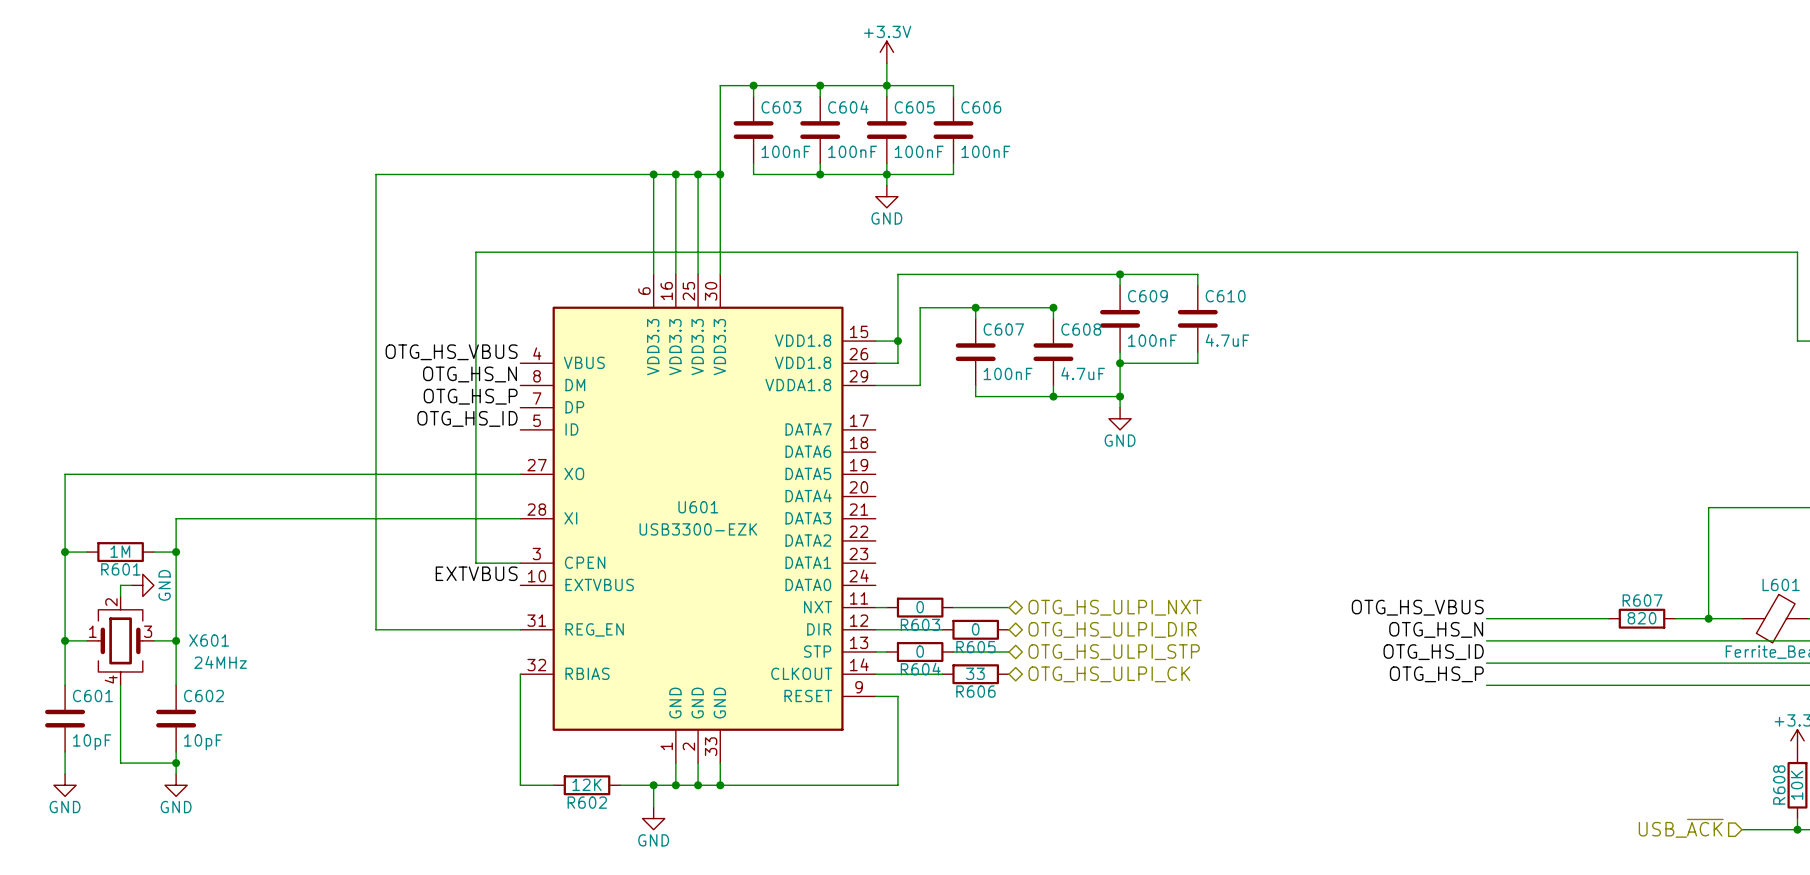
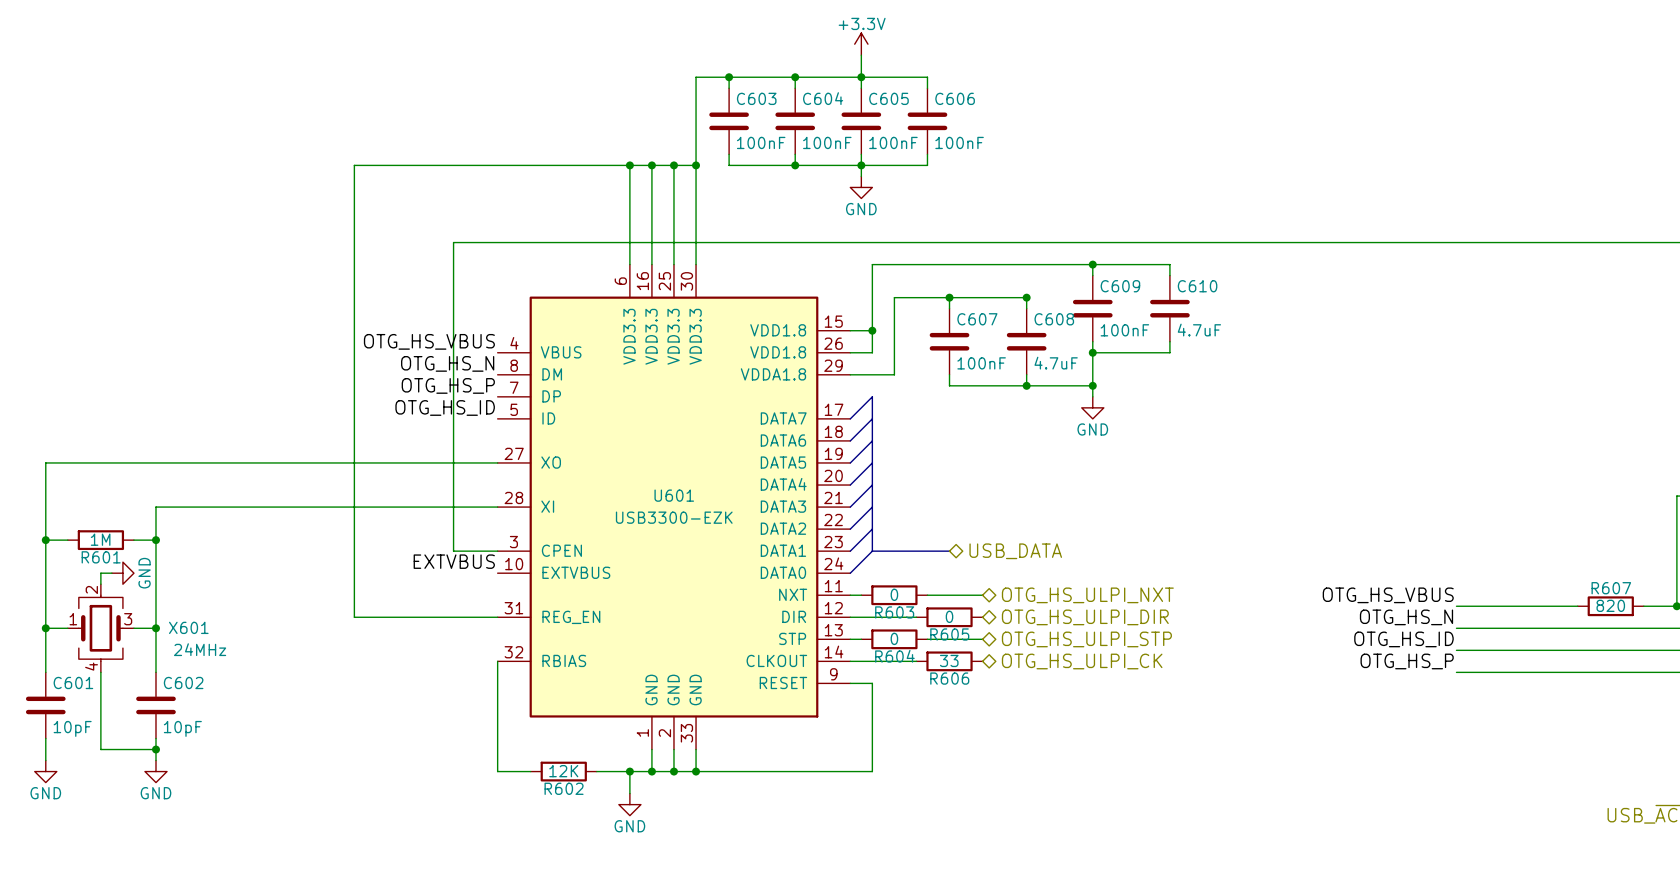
bus: none -> (850, 418) (872, 396) (872, 551)
bus: none -> (872, 418) (850, 440)
bus: none -> (872, 440) (850, 462)
bus: none -> (872, 462) (850, 485)
bus: none -> (872, 485) (850, 507)
bus: none -> (872, 507) (850, 529)
bus: none -> (872, 529) (850, 551)
bus: none -> (872, 551) (850, 573)
bus: none -> (872, 551) (949, 551)
hierarchical label: none -> USB_DATA (1015, 551)

